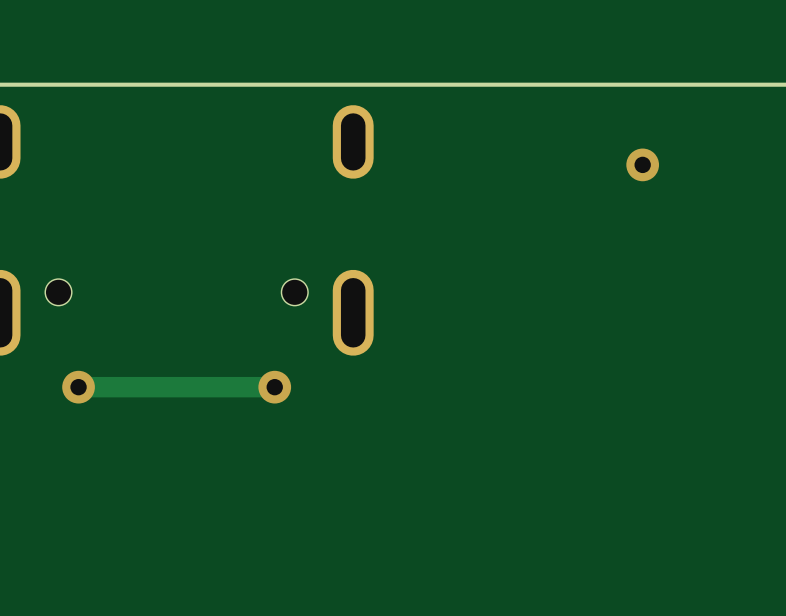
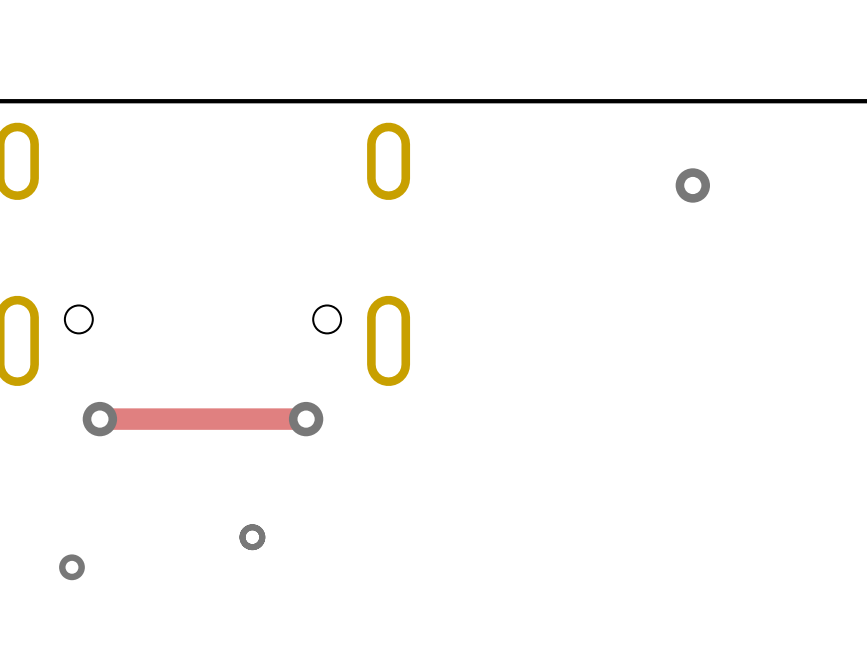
via: none -> (252, 537)
via: none -> (71, 567)

